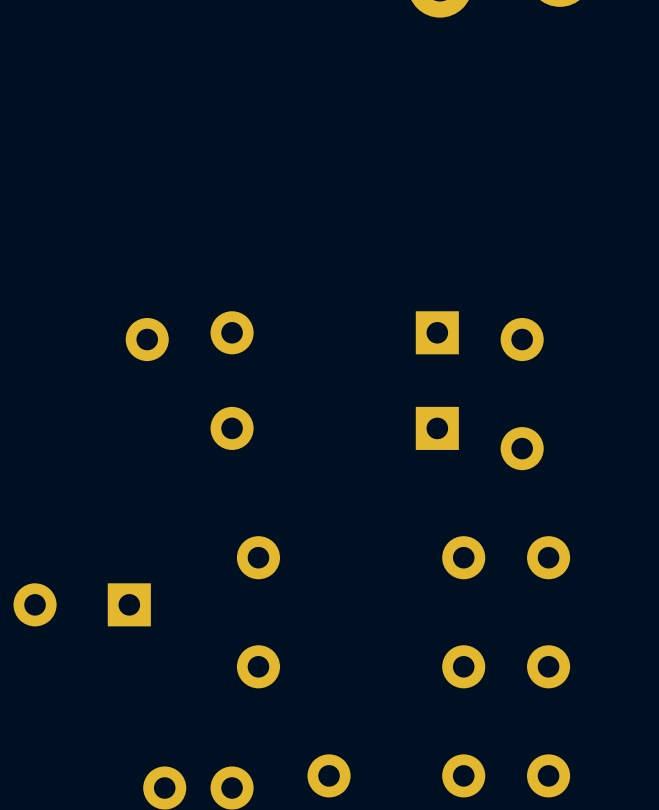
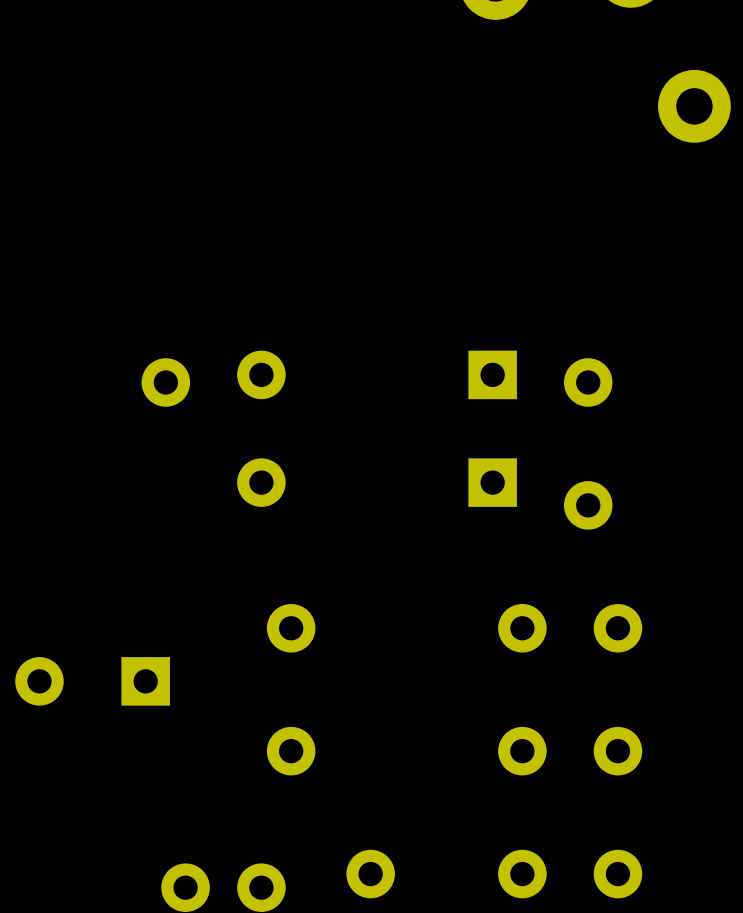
part: none -> (694, 106)

